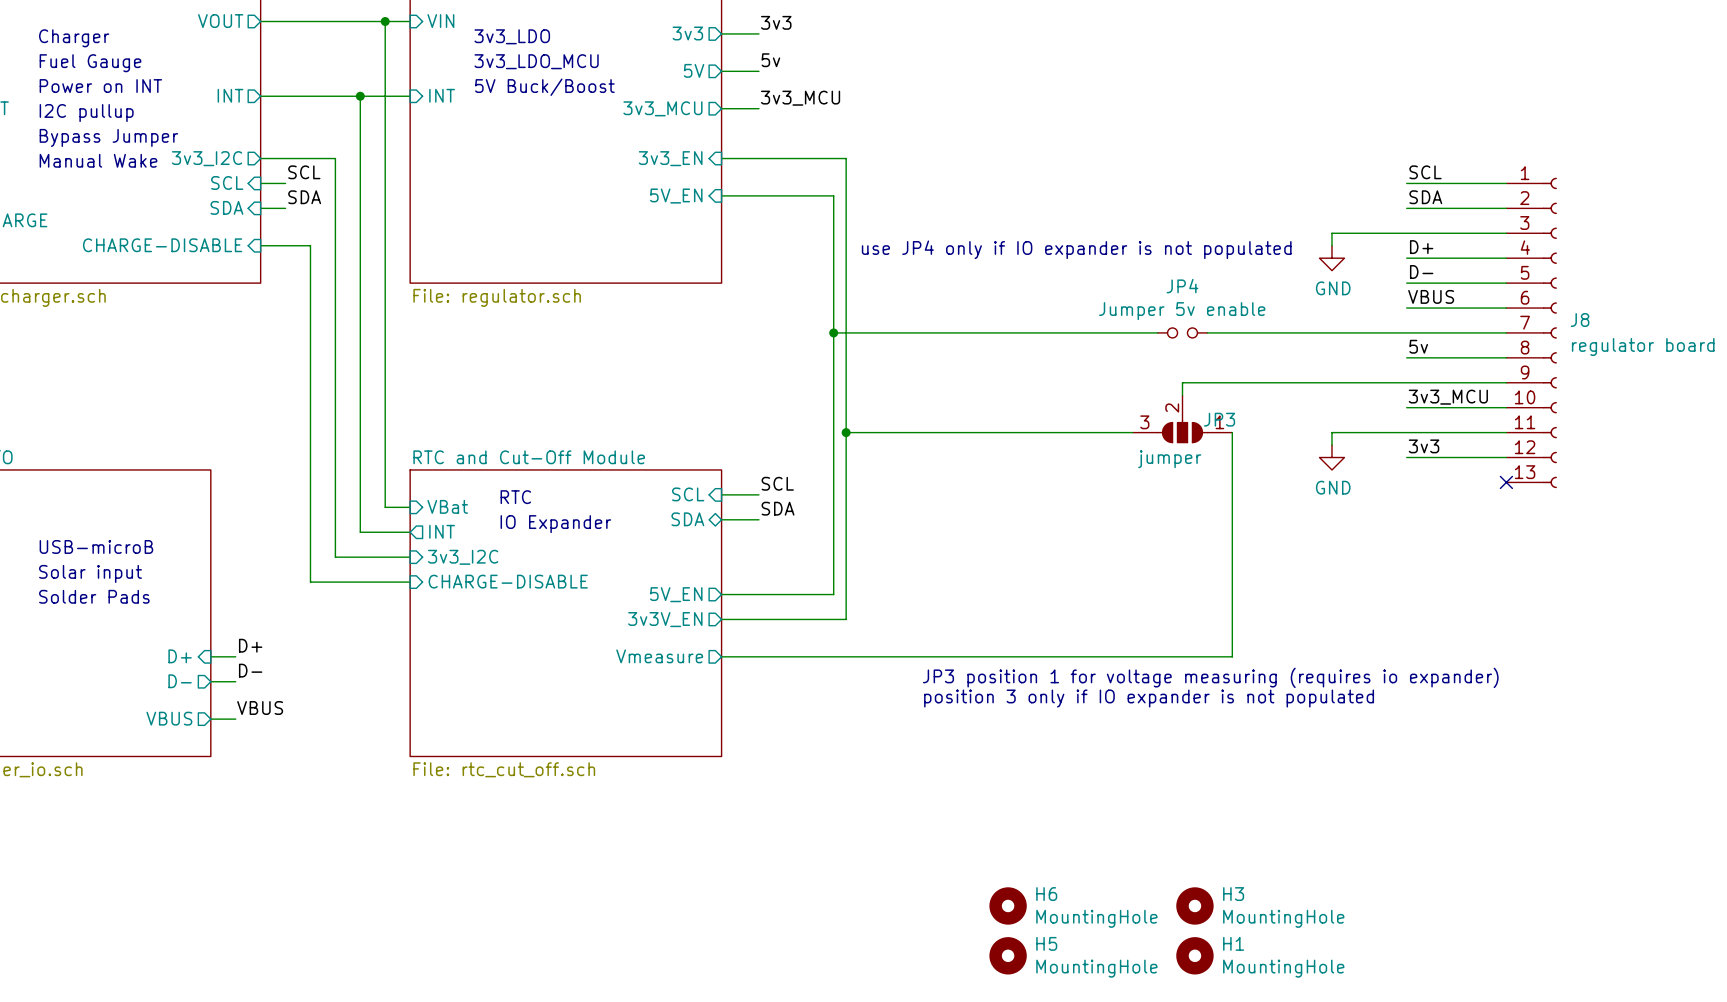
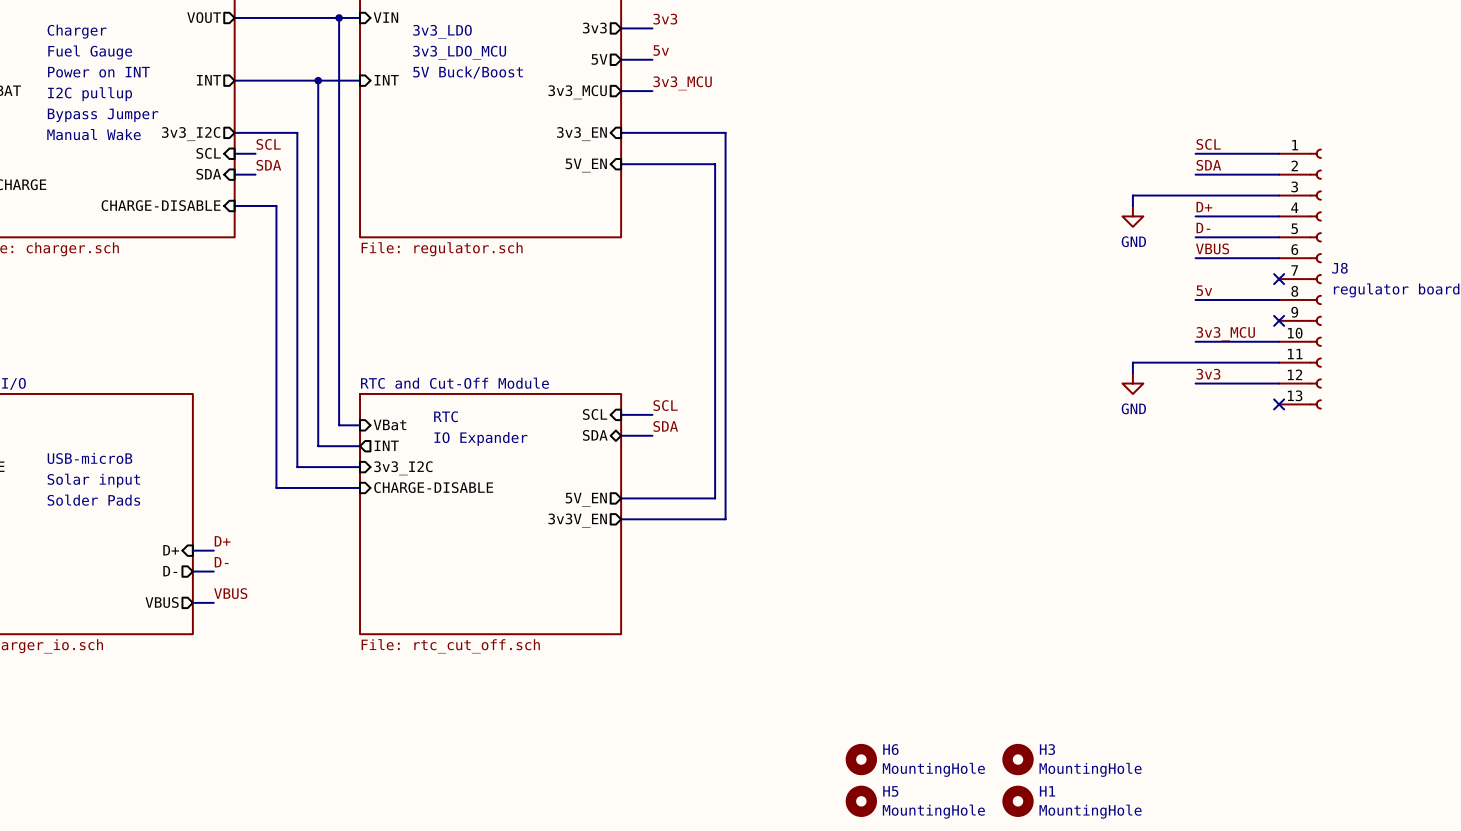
text: use JP4 only if IO expander is not populated (1076, 249) -> none
wire: (833, 332) (1157, 332) -> none
junction: (833, 332) -> none
JP4: Jumper 5v enable (1182, 332) -> none
wire: (1207, 332) (1506, 332) -> none
no-connect mark: none -> (1279, 279)
wire: (1506, 382) (1182, 382) (1182, 395) -> none
no-connect mark: none -> (1279, 320)
JP3: jumper (1182, 418) -> none
wire: (846, 432) (1132, 432) -> none
junction: (846, 432) -> none
wire: (1232, 432) (1232, 656) (721, 656) -> none
sheet pin: Vmeasure (659, 656) -> none
text: JP3 position 1 for voltage measuring (requires io expander) (1210, 677) -> none
text: position 3 only if IO expander is not populated (1149, 698) -> none

